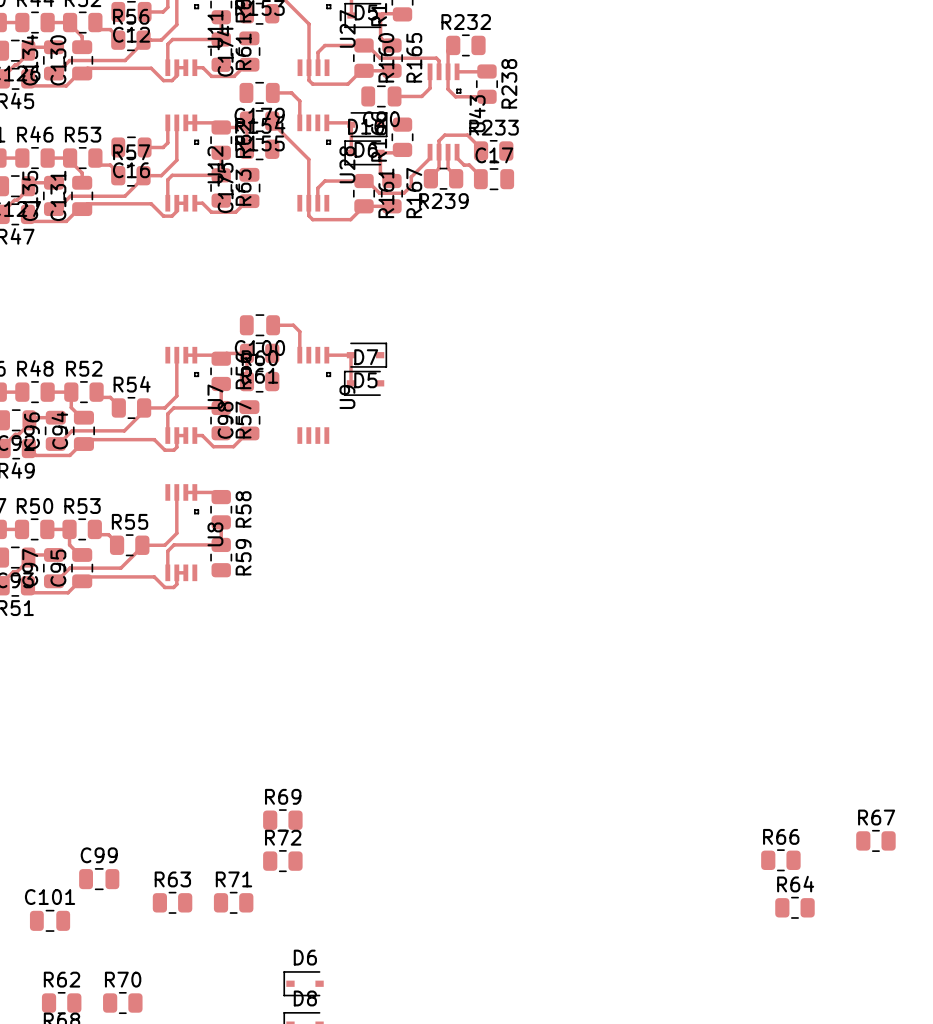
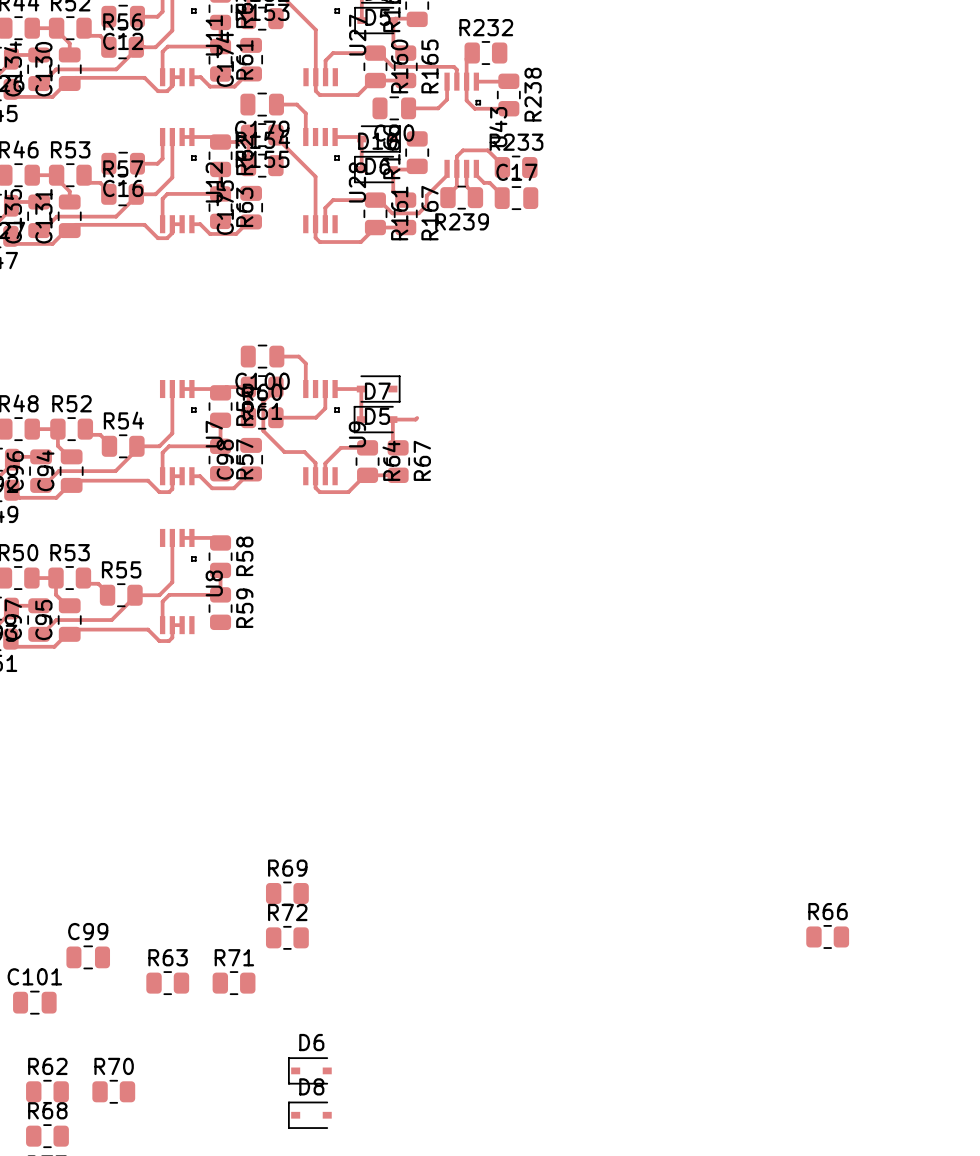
top track: none -> (275, 387) (263, 401) (263, 430) (284, 452) (304, 452) (315, 463) (315, 487) (319, 492) (348, 492) (365, 475) (398, 475)
top track: none -> (325, 389) (325, 408) (316, 417) (275, 417)
top track: none -> (417, 418) (392, 419) (392, 442) (398, 447)
top track: none -> (367, 447) (340, 447) (325, 463) (325, 476)
R67 rotation: 0° (875, 840) -> 90° clockwise (398, 461)
R67 position: (875, 840) -> (398, 461)
R64 rotation: 0° (794, 907) -> 90° clockwise (367, 461)
R64 position: (794, 907) -> (367, 461)

